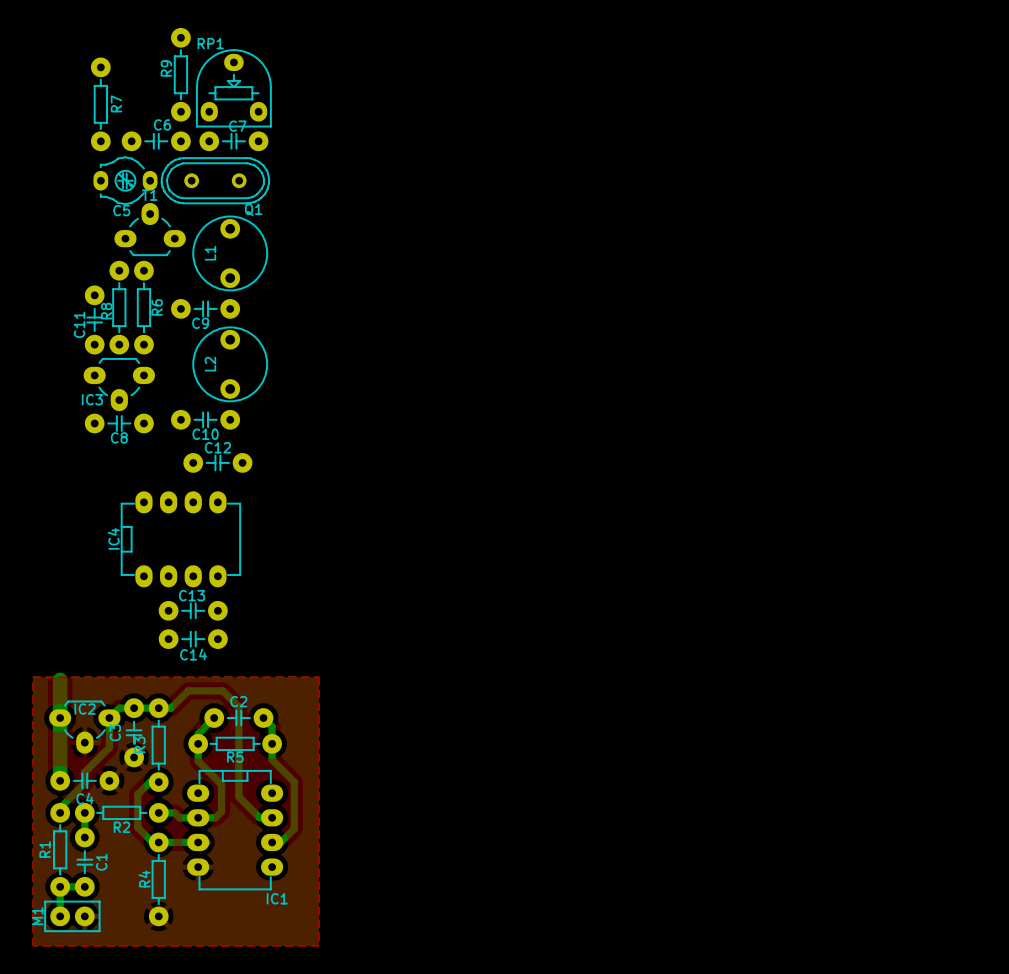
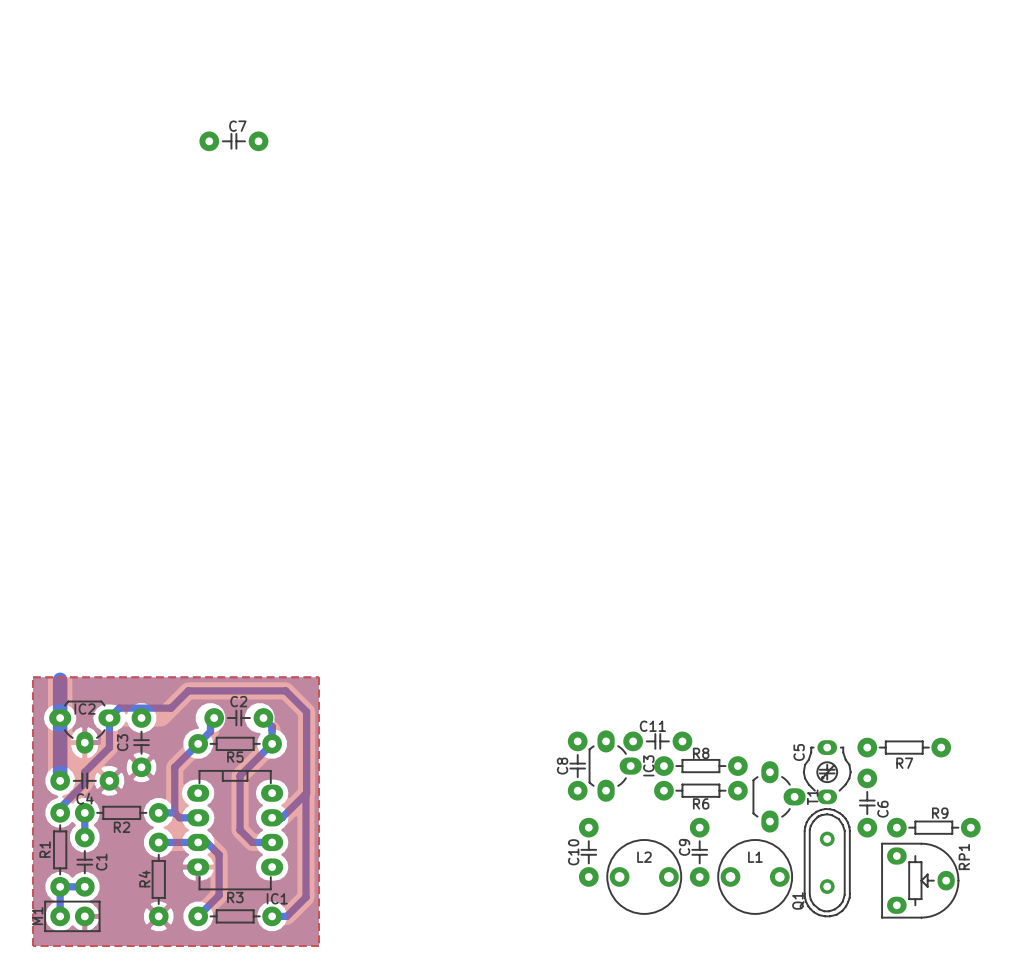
R9 rotation: 0° (180, 74) -> 90° clockwise (933, 827)
R9 position: (180, 74) -> (933, 827)
RP1 rotation: 0° (233, 88) -> 90° clockwise (920, 880)
RP1 position: (233, 88) -> (920, 880)
R7 rotation: 0° (100, 104) -> 90° clockwise (904, 747)
R7 position: (100, 104) -> (904, 747)
C6 rotation: 0° (156, 141) -> 90° clockwise (867, 803)
C6 position: (156, 141) -> (867, 803)
C5 rotation: 0° (125, 180) -> 90° clockwise (827, 772)
C5 position: (125, 180) -> (827, 772)
Q1 rotation: 0° (215, 180) -> 90° clockwise (827, 862)
Q1 position: (215, 180) -> (827, 862)
T1 rotation: 0° (150, 229) -> 90° clockwise (779, 796)
T1 position: (150, 229) -> (779, 796)
L1 rotation: 0° (230, 253) -> 90° clockwise (755, 876)
L1 position: (230, 253) -> (755, 876)
R8 rotation: 0° (119, 307) -> 90° clockwise (700, 766)
R8 position: (119, 307) -> (700, 766)
R6 rotation: 0° (143, 307) -> 90° clockwise (700, 790)
R6 position: (143, 307) -> (700, 790)
C9 rotation: 0° (205, 308) -> 90° clockwise (699, 852)
C9 position: (205, 308) -> (699, 852)
C11 rotation: 0° (94, 319) -> 90° clockwise (657, 741)
C11 position: (94, 319) -> (657, 741)
L2 rotation: 0° (230, 364) -> 90° clockwise (644, 876)
L2 position: (230, 364) -> (644, 876)
IC3 rotation: 0° (119, 384) -> 90° counterclockwise (615, 766)
IC3 position: (119, 384) -> (615, 766)
IC3 name position: IC3 (92, 399) -> IC3 (648, 765)
C10 rotation: 0° (205, 419) -> 90° clockwise (588, 852)
C10 position: (205, 419) -> (588, 852)
C8 rotation: 0° (119, 423) -> 90° clockwise (577, 766)
C8 position: (119, 423) -> (577, 766)
C12: (217, 462) -> none
IC4: (180, 539) -> none
C13: (193, 610) -> none
C14: (193, 639) -> none
bottom track: (222, 690) (238, 706) (238, 796) (259, 817) (272, 817) -> (222, 690) (285, 690) (306, 711) (306, 793) (281, 817) (272, 817)
bottom track: none -> (210, 718) (210, 731) (174, 767) (174, 812)
bottom track: (214, 718) (198, 734) (198, 761) (221, 784) (221, 811) (215, 817) (198, 817) -> none
C3 position: (134, 732) -> (141, 742)
bottom track: (272, 743) (272, 759) (294, 782) (294, 828) (280, 842) (272, 842) -> (272, 743) (240, 775) (240, 830) (252, 842) (272, 842)
R3 rotation: 0° (158, 745) -> 90° clockwise (235, 916)
R3 position: (158, 745) -> (235, 916)
bottom track: (158, 782) (150, 782) (137, 794) (137, 827) (152, 842) (158, 842) -> none
bottom track: none -> (306, 793) (306, 897) (286, 916) (272, 916)
bottom track: none -> (206, 842) (219, 854) (219, 895) (198, 916)

